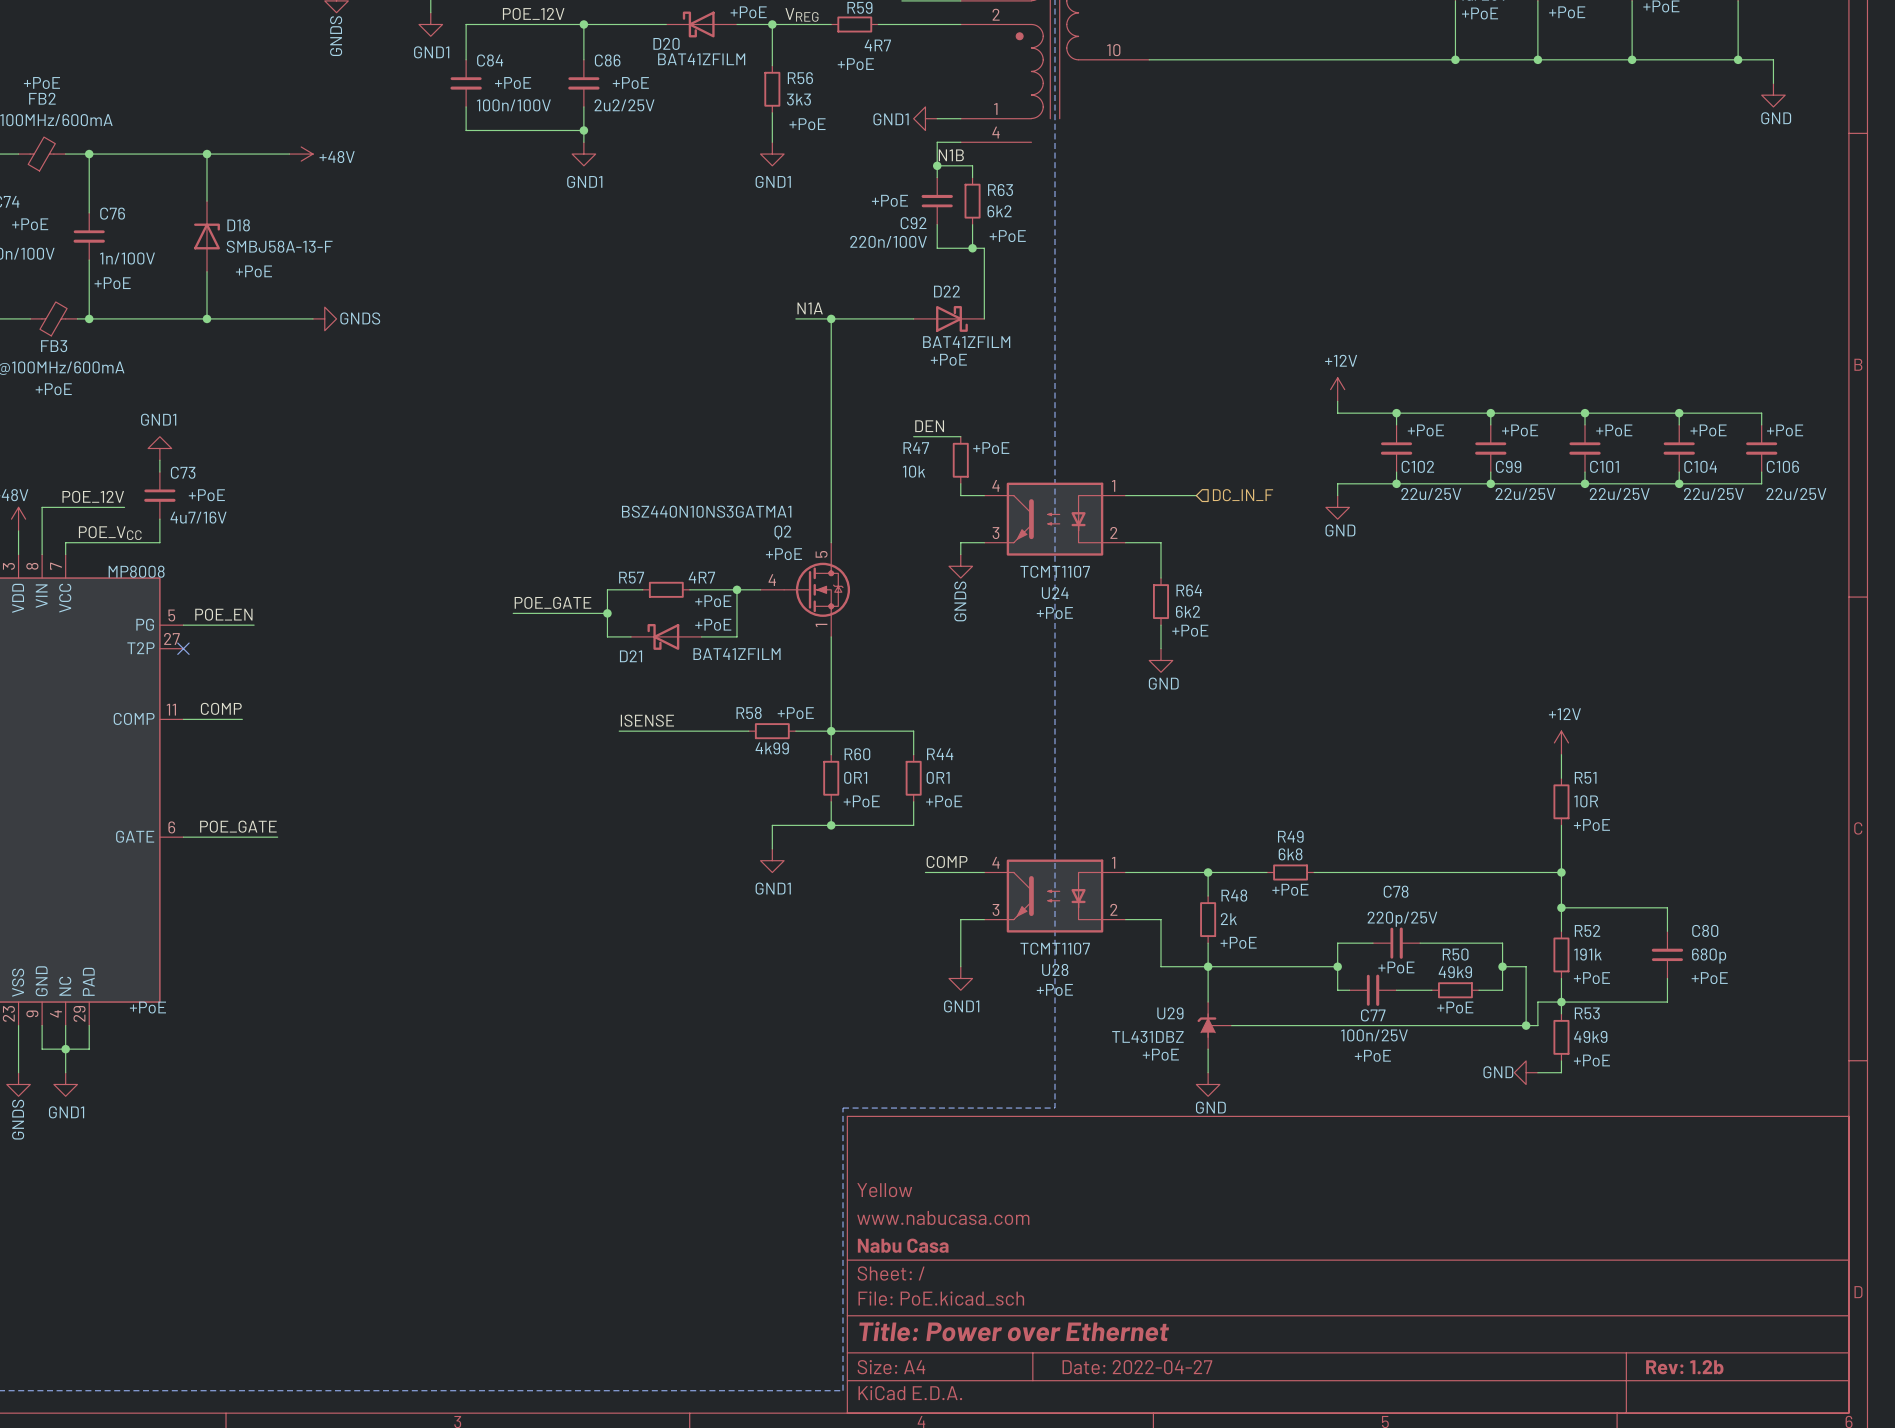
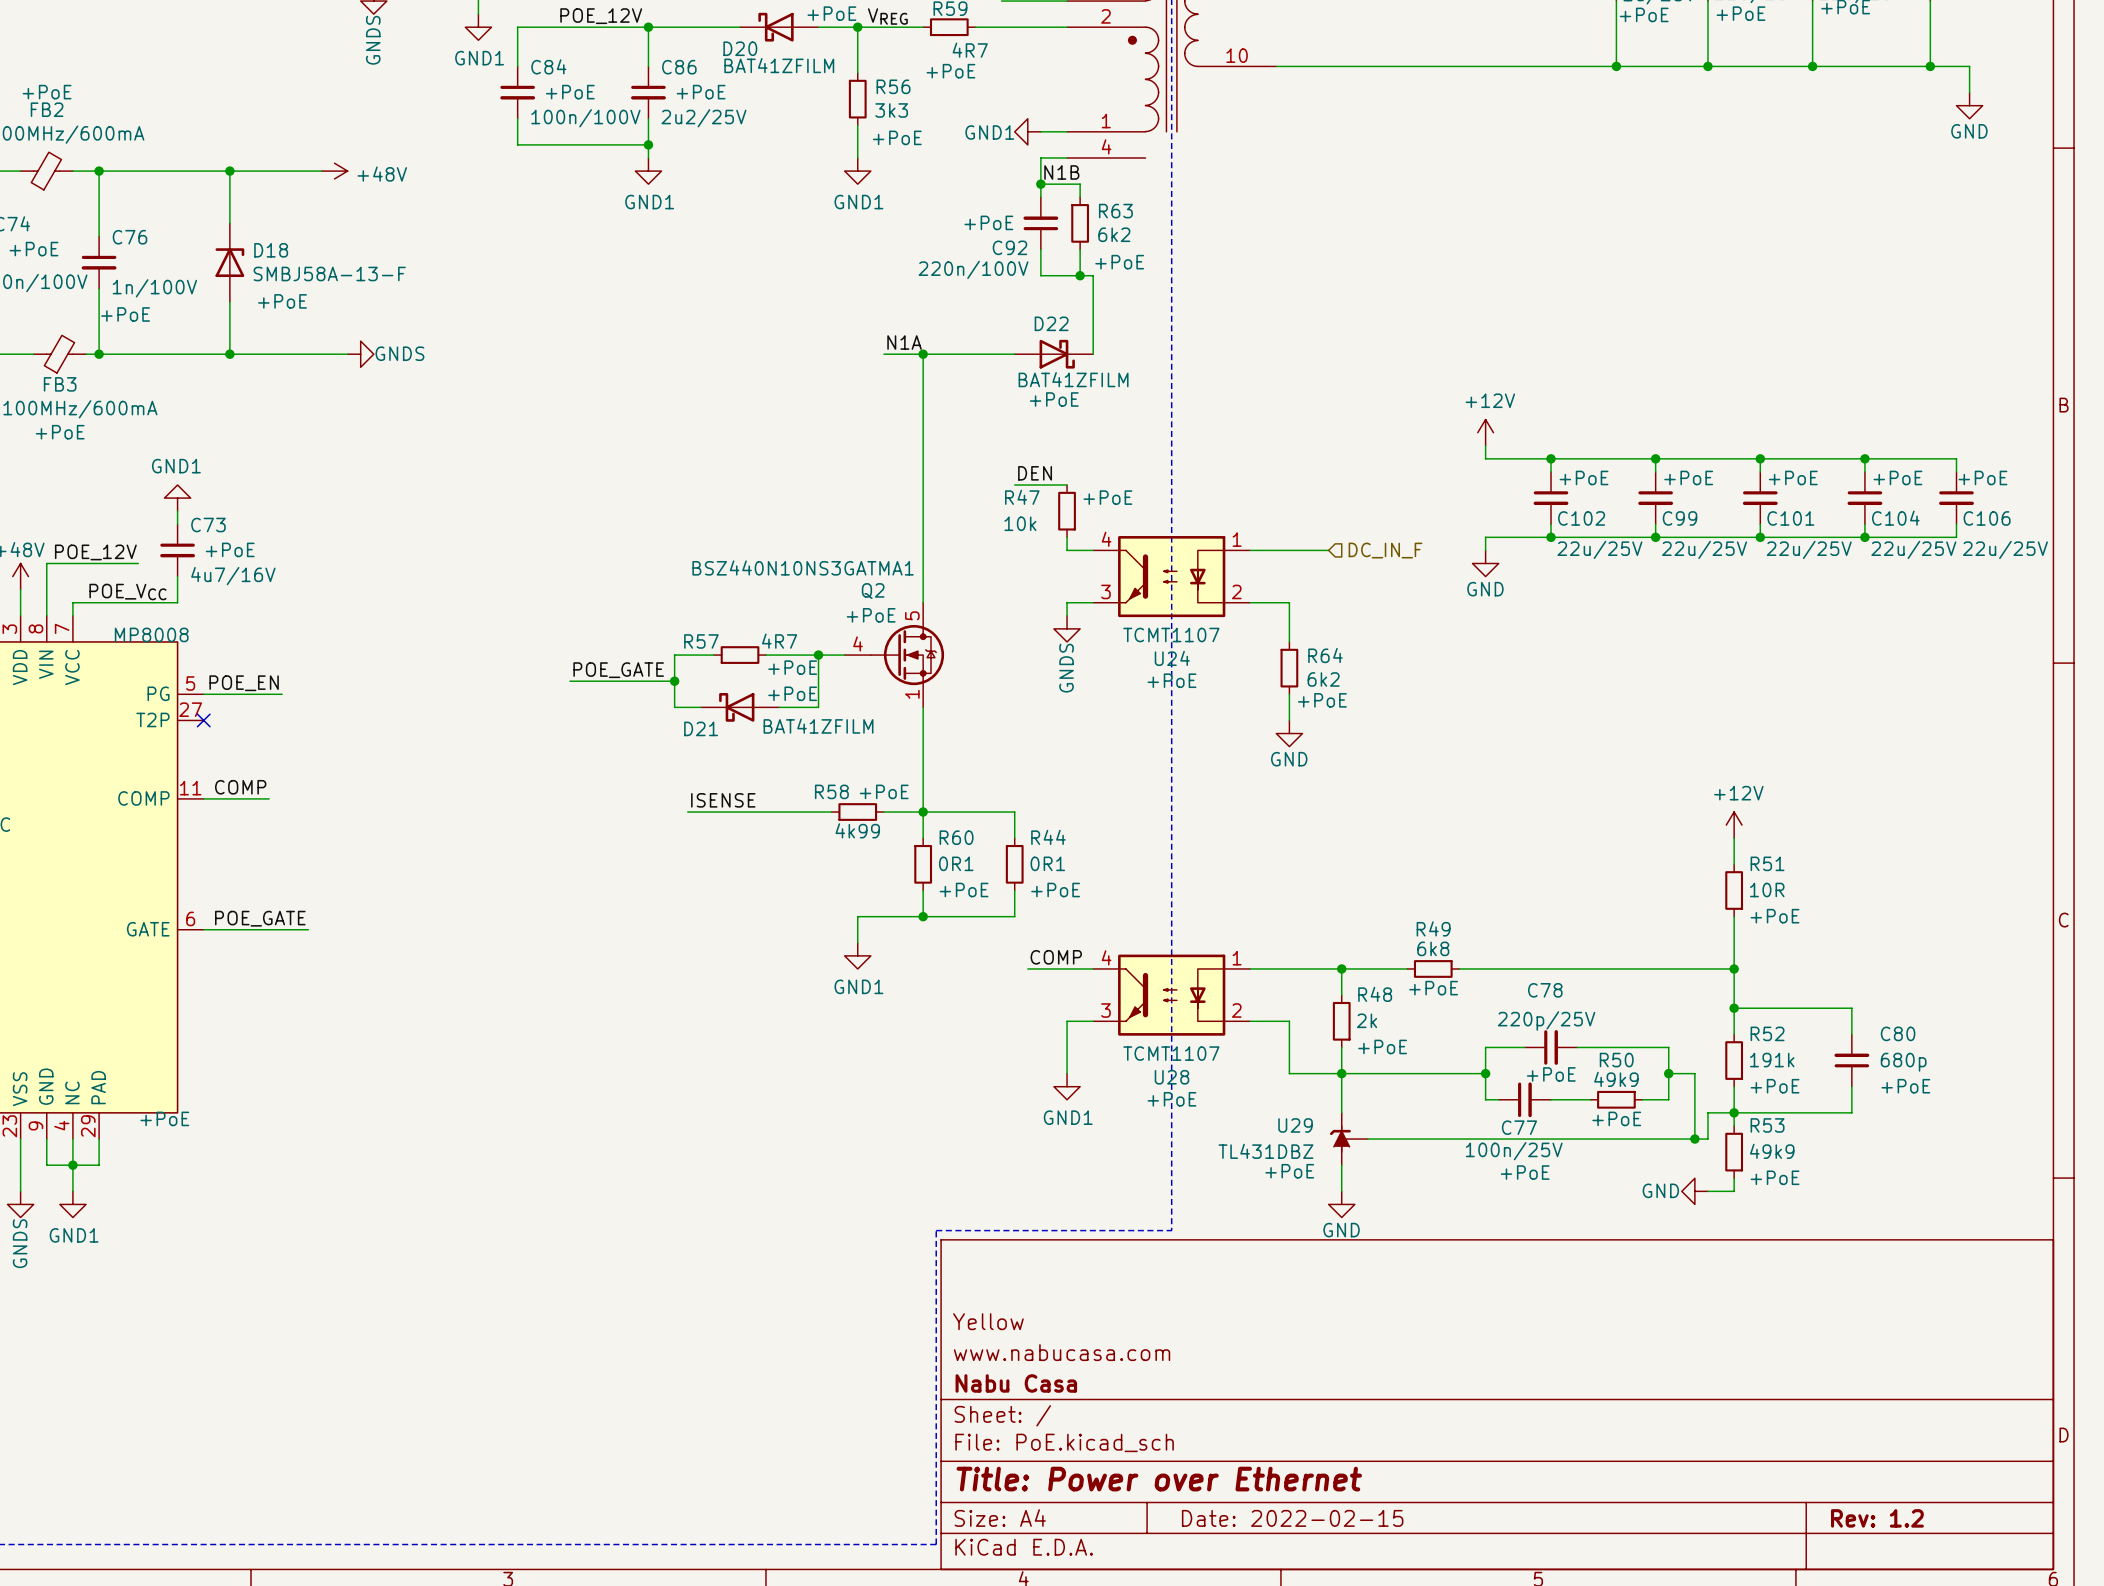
title block: Date: 2022-04-27 (1137, 1367) -> Date: 2022-02-15 (1292, 1518)
title block: Rev: 1.2b (1684, 1367) -> Rev: 1.2 (1877, 1518)

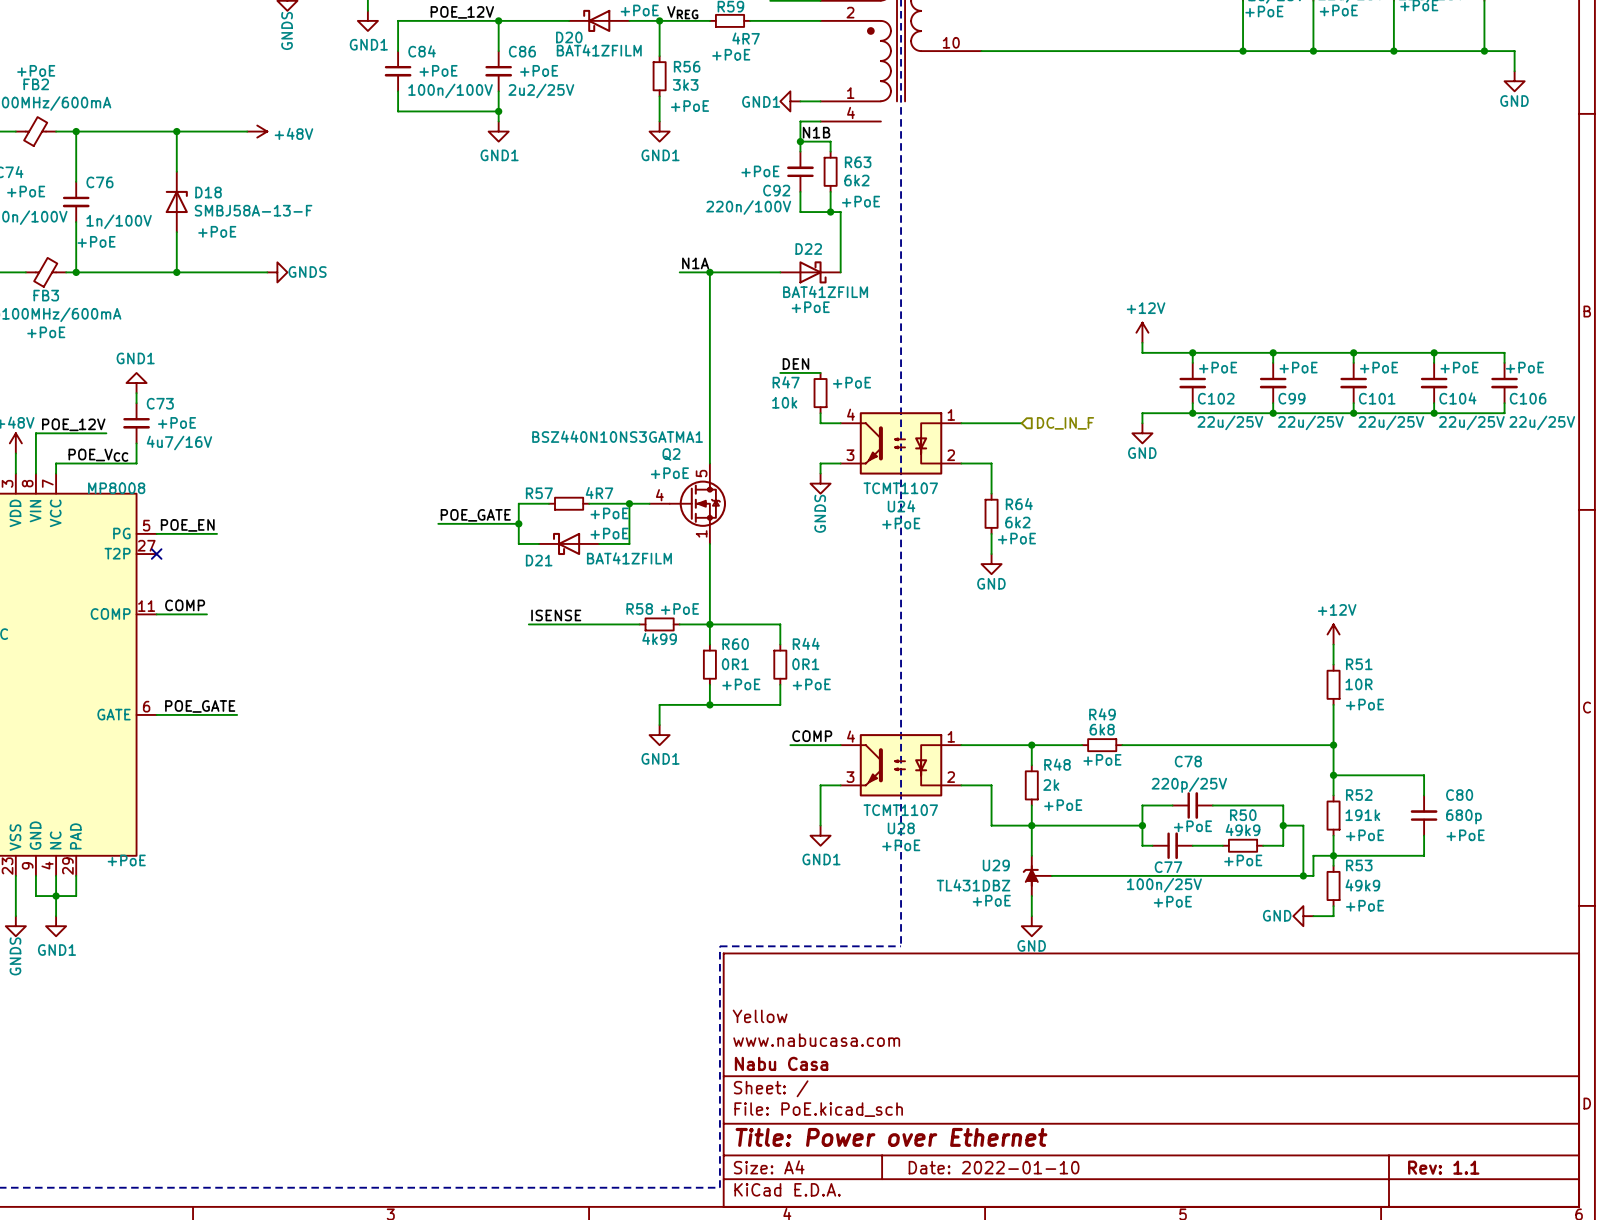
title block: Date: 2022-02-15 (1292, 1518) -> Date: 2022-01-10 (994, 1167)
title block: Rev: 1.2 (1877, 1518) -> Rev: 1.1 (1443, 1167)

